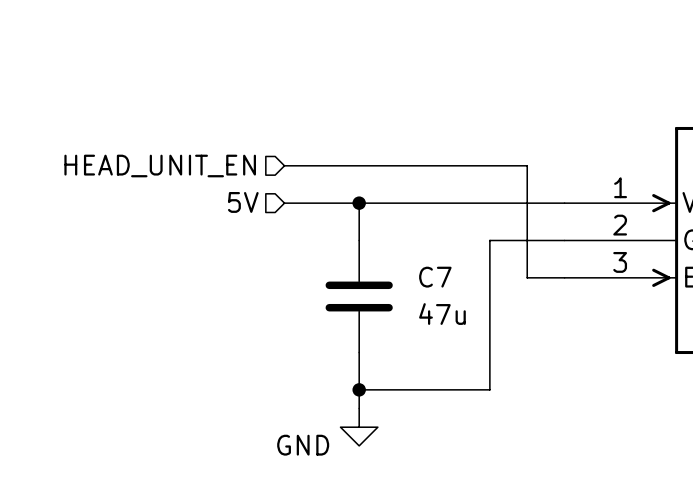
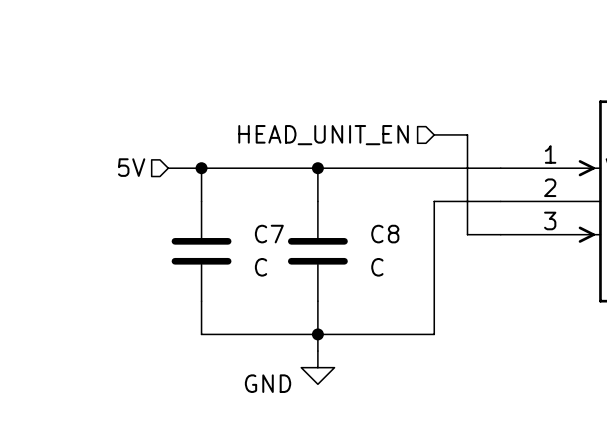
wire: (284, 165) (489, 165) -> none
hierarchical label position: HEAD_UNIT_EN (160, 166) -> HEAD_UNIT_EN (323, 135)
hierarchical label position: 5V (243, 202) -> 5V (131, 167)
wire: none -> (168, 168) (251, 168)
wire: none -> (201, 168) (201, 201)
junction: none -> (201, 168)
C7 name: C7 (435, 277) -> C8 (385, 234)
C7: none -> C (201, 251)
C7 value: 47u (442, 314) -> C (377, 267)
wire: none -> (201, 301) (201, 334) (317, 334)

